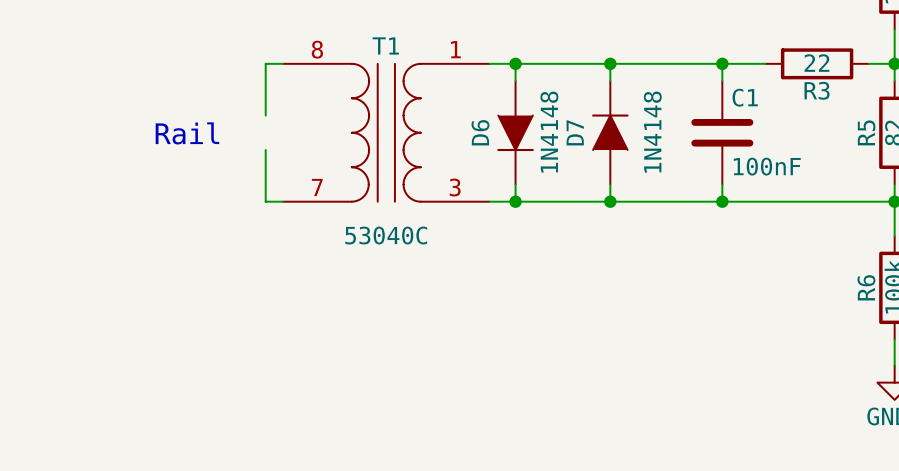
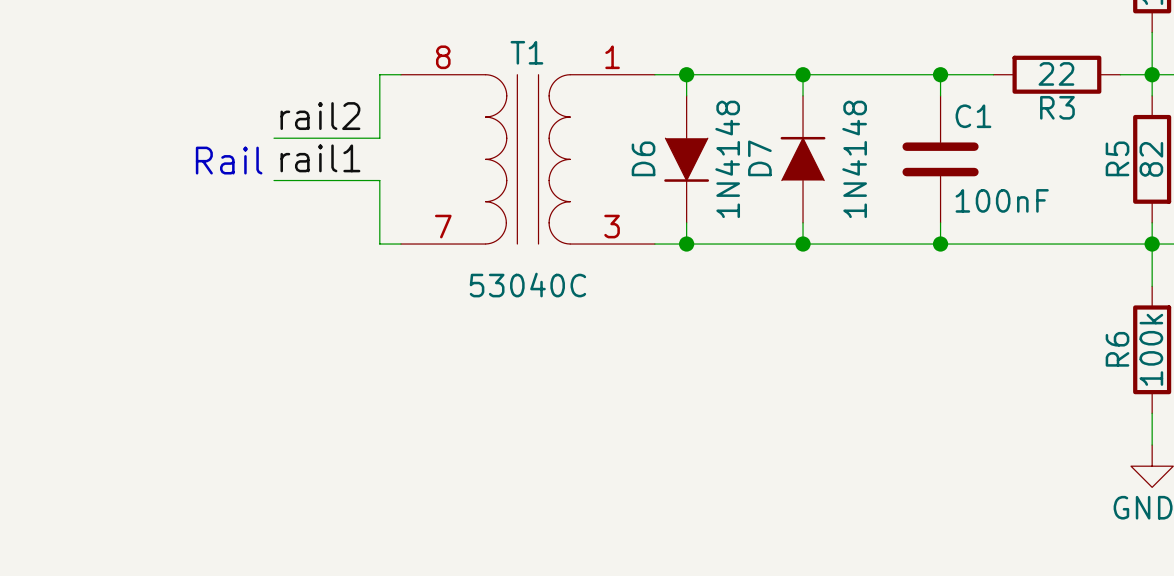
label: none -> rail2 (320, 116)
wire: none -> (274, 138) (379, 138)
label: none -> rail1 (320, 158)
text position: Rail (187, 133) -> Rail (229, 160)
wire: none -> (274, 180) (379, 180)

